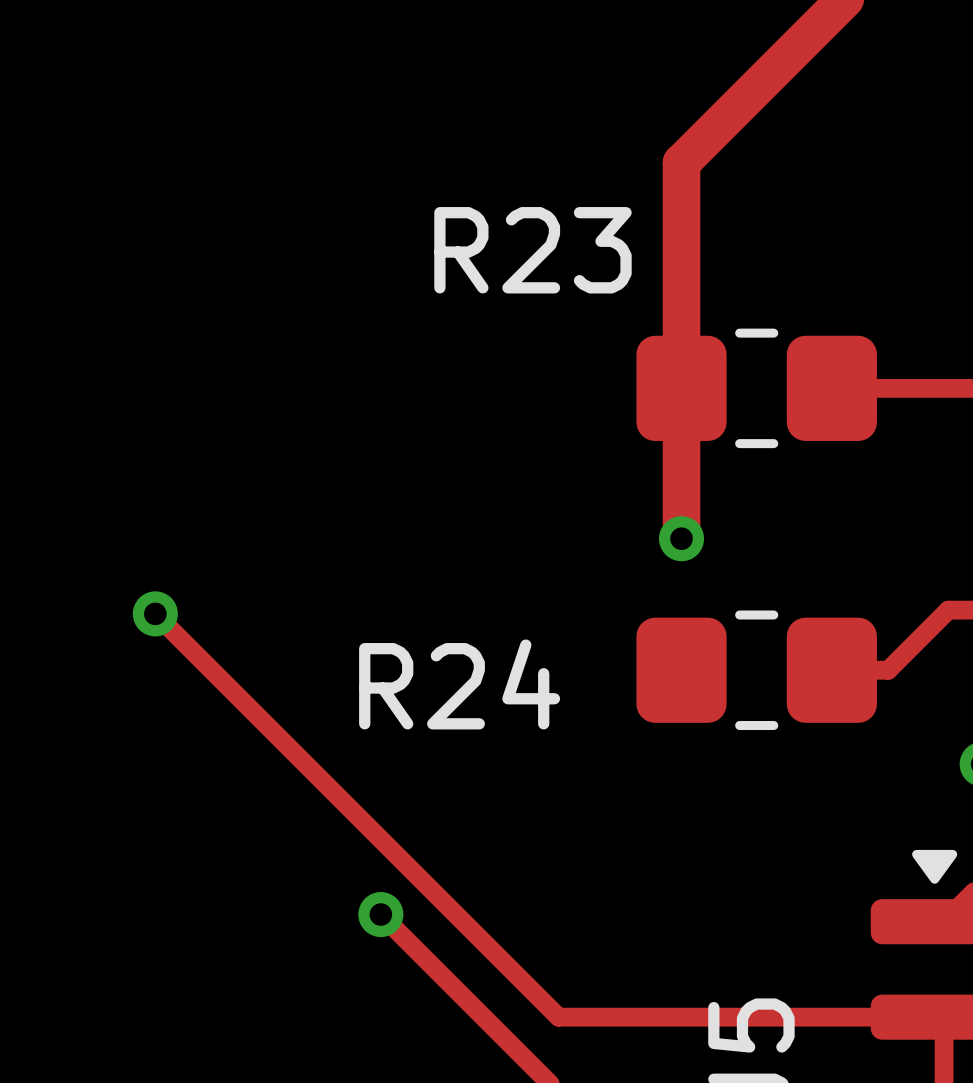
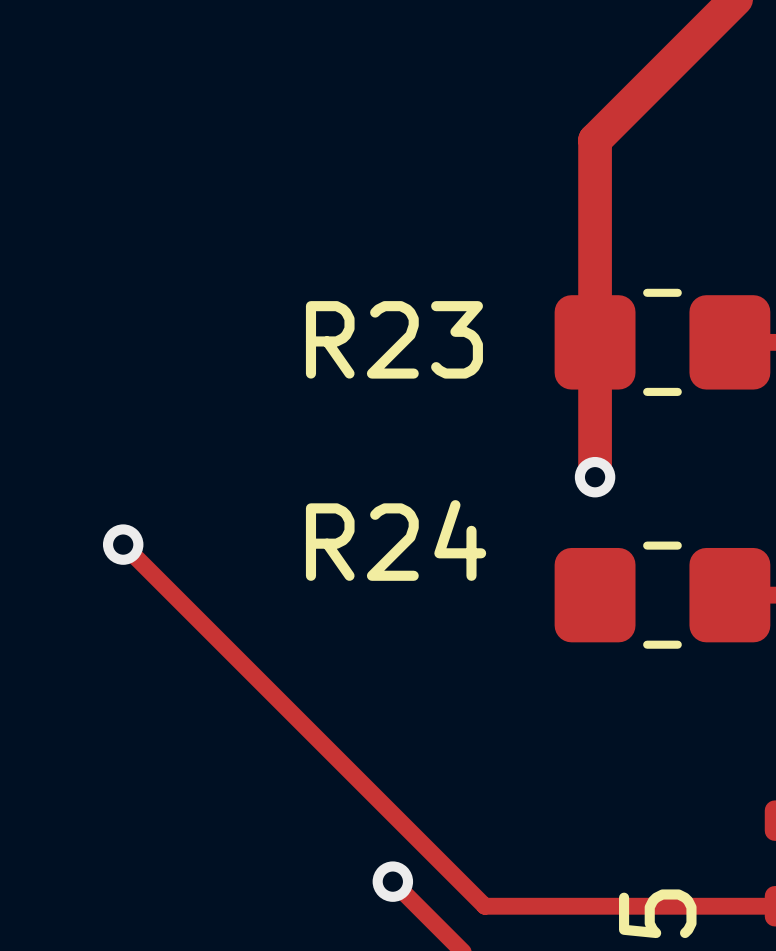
R23 name position: R23 (532, 250) -> R23 (394, 339)
R24 name position: R24 (459, 684) -> R24 (396, 540)
track: (380, 914) (456, 989) -> none
via position: (380, 914) -> (392, 881)

